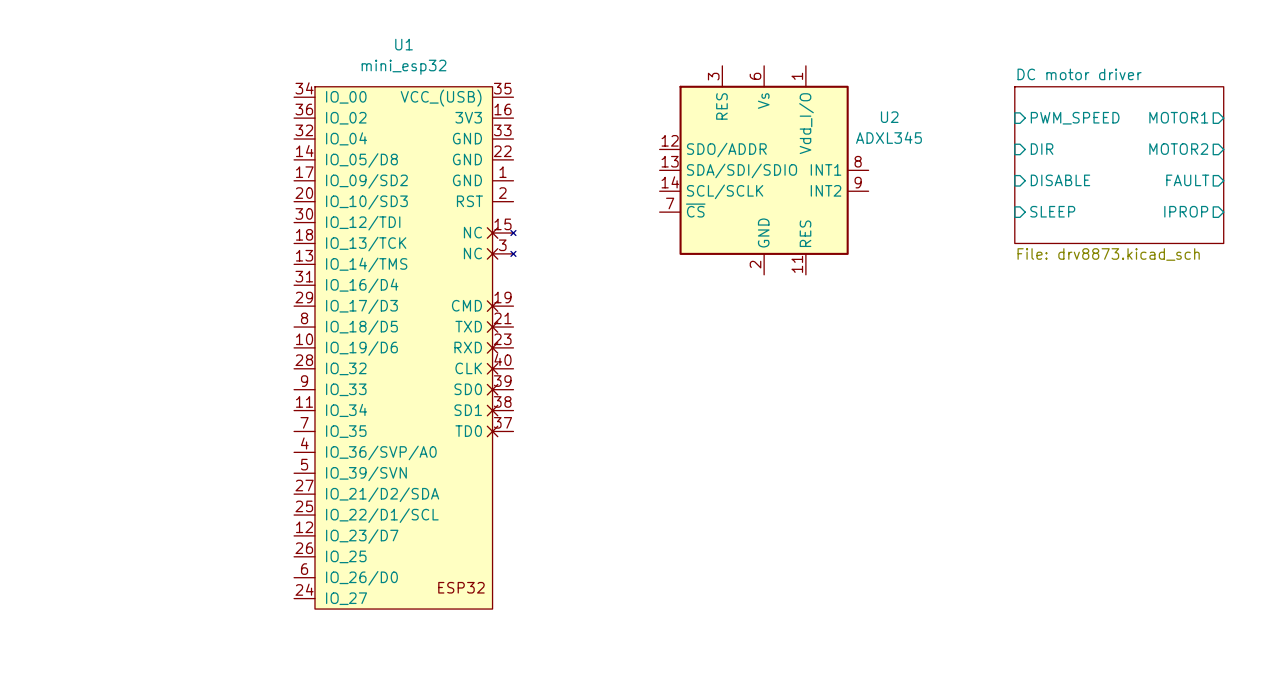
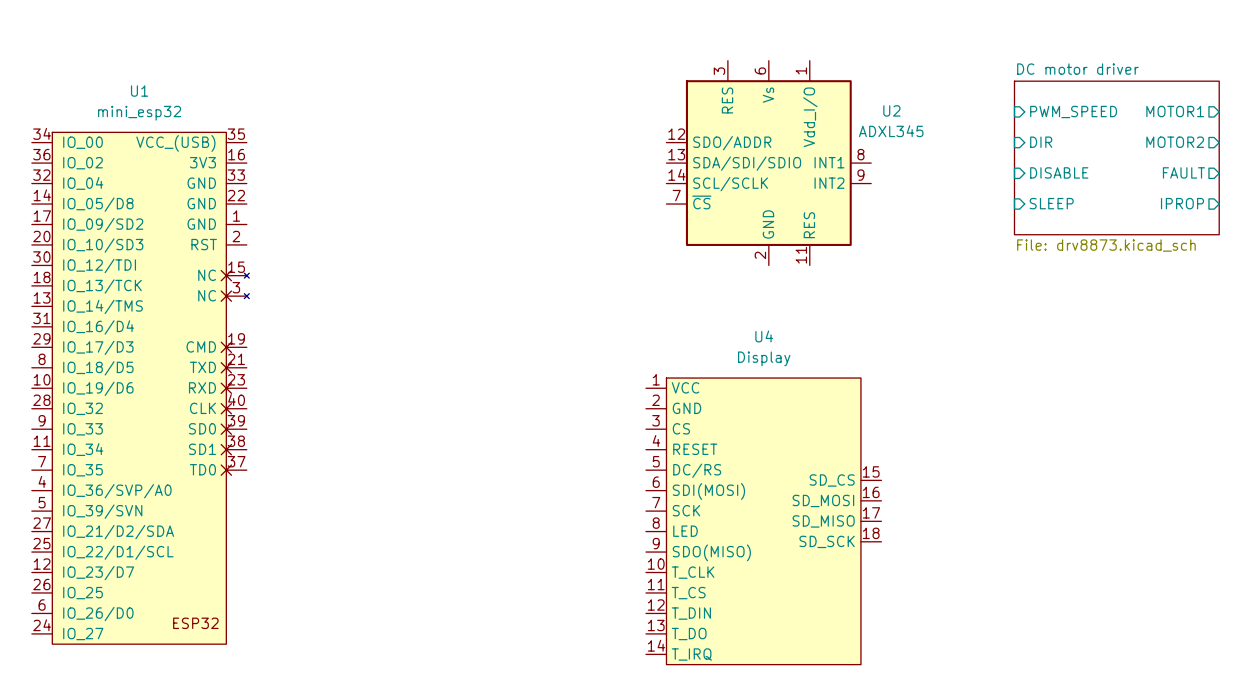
U1 position: (405, 347) -> (140, 388)
U4: none -> Display (763, 521)

